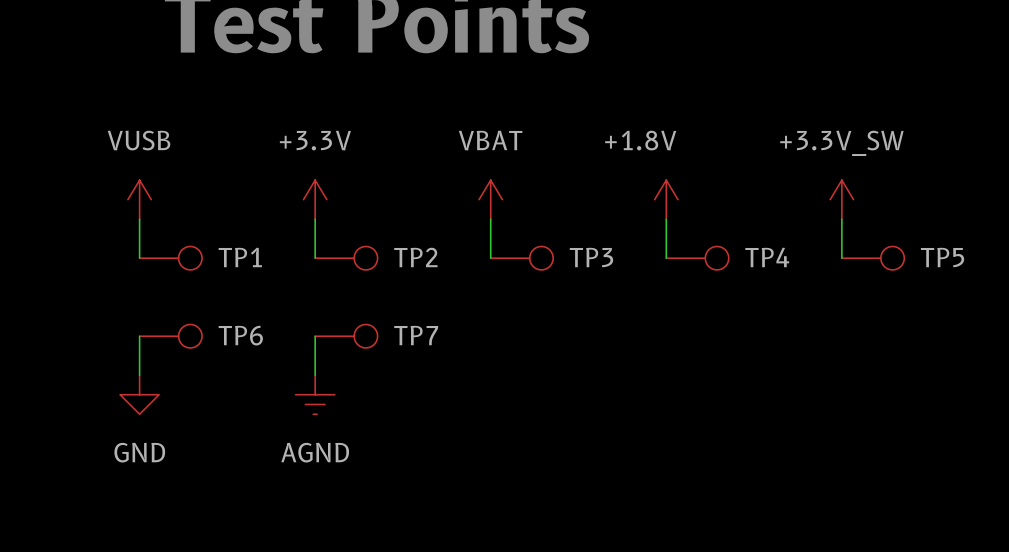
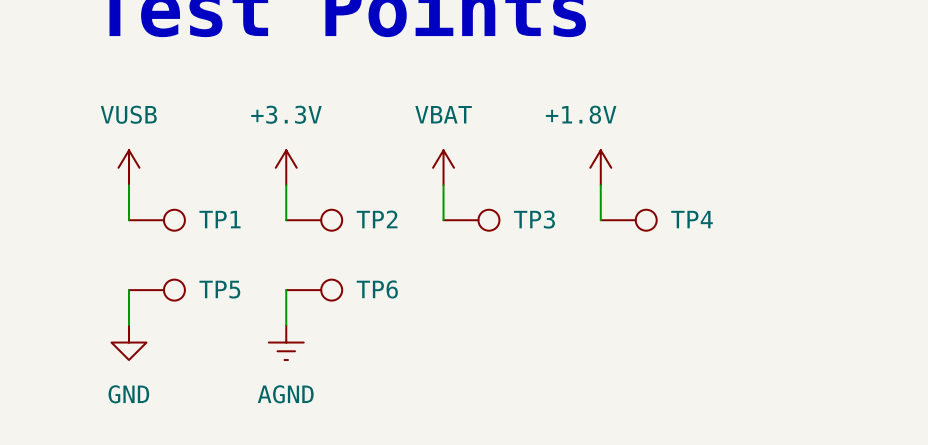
power symbol: +3.3V_SW (841, 199) -> none
wire: (841, 219) (841, 258) -> none
TP5: (873, 258) -> none
TP6 name: TP6 (240, 335) -> TP5 (219, 289)
TP7 name: TP7 (416, 335) -> TP6 (377, 289)

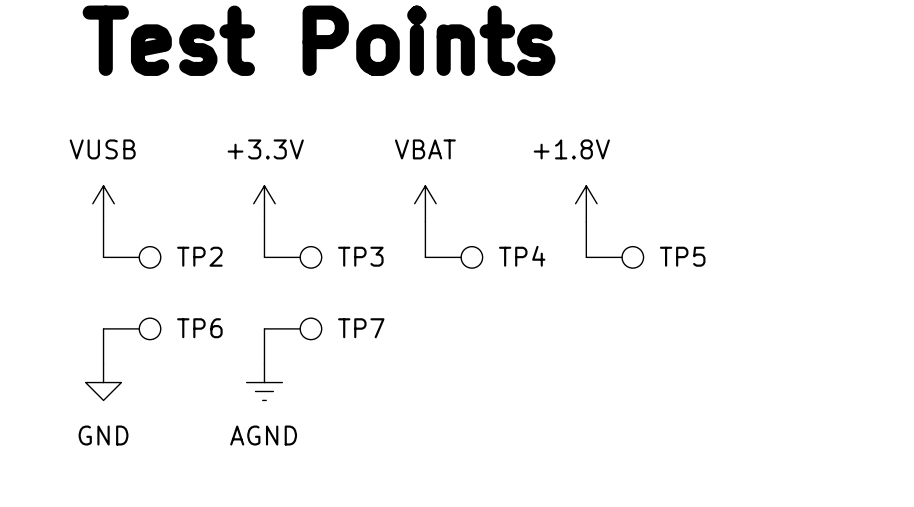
TP1 name: TP1 (220, 219) -> TP2 (199, 256)
TP2 name: TP2 (377, 219) -> TP3 (360, 256)
TP3 name: TP3 (534, 219) -> TP4 (522, 256)
TP4 name: TP4 (692, 219) -> TP5 (682, 256)
TP5 name: TP5 (219, 289) -> TP6 (199, 328)
TP6 name: TP6 (377, 289) -> TP7 (361, 328)

